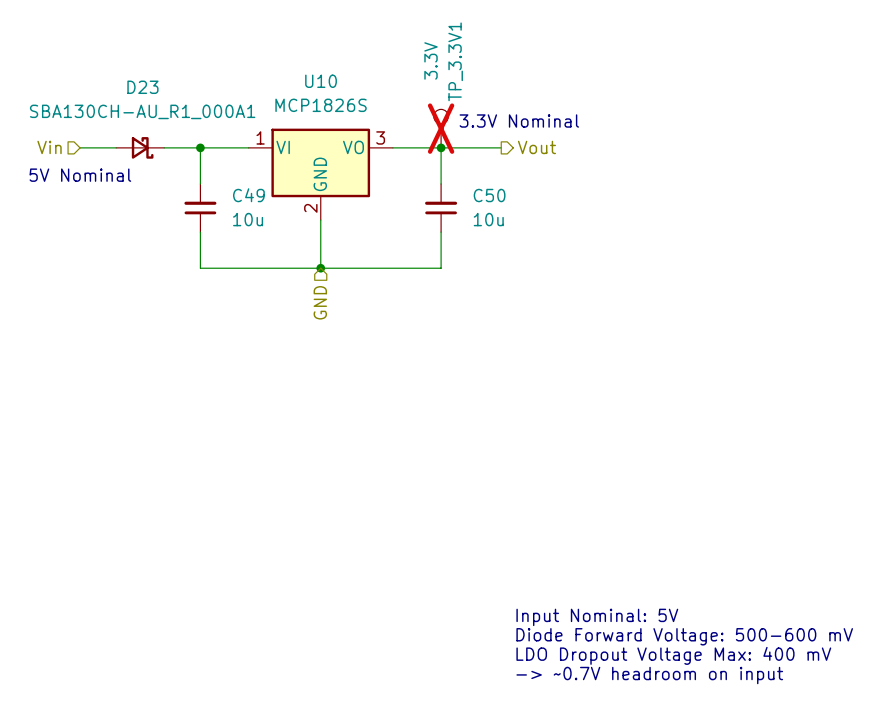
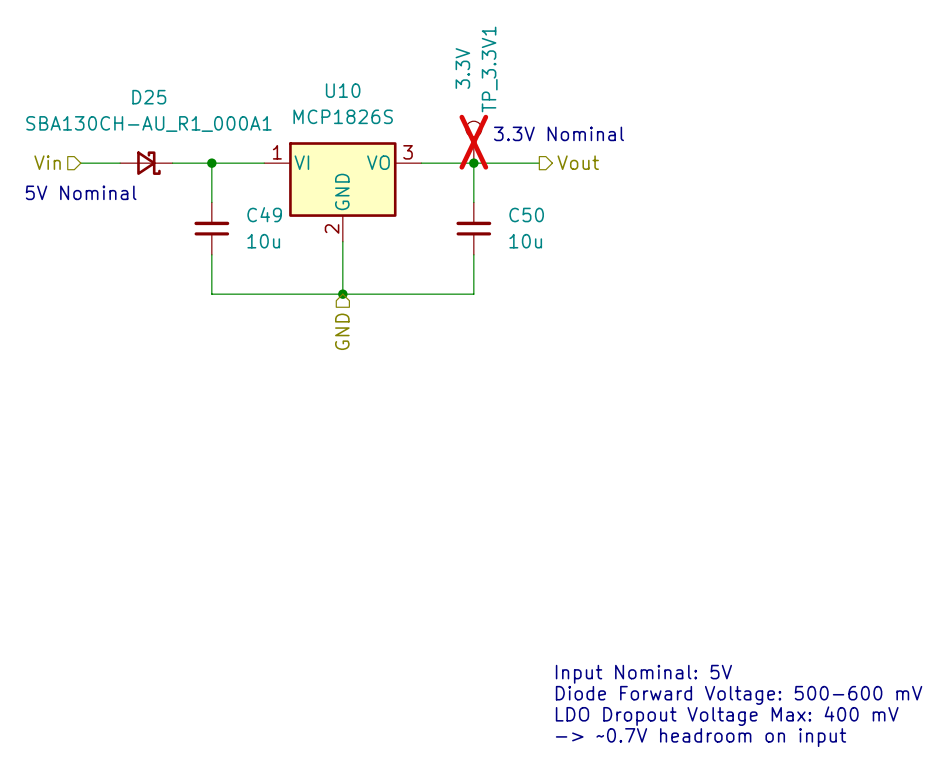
D23 name: D23 (142, 87) -> D25 (149, 97)

